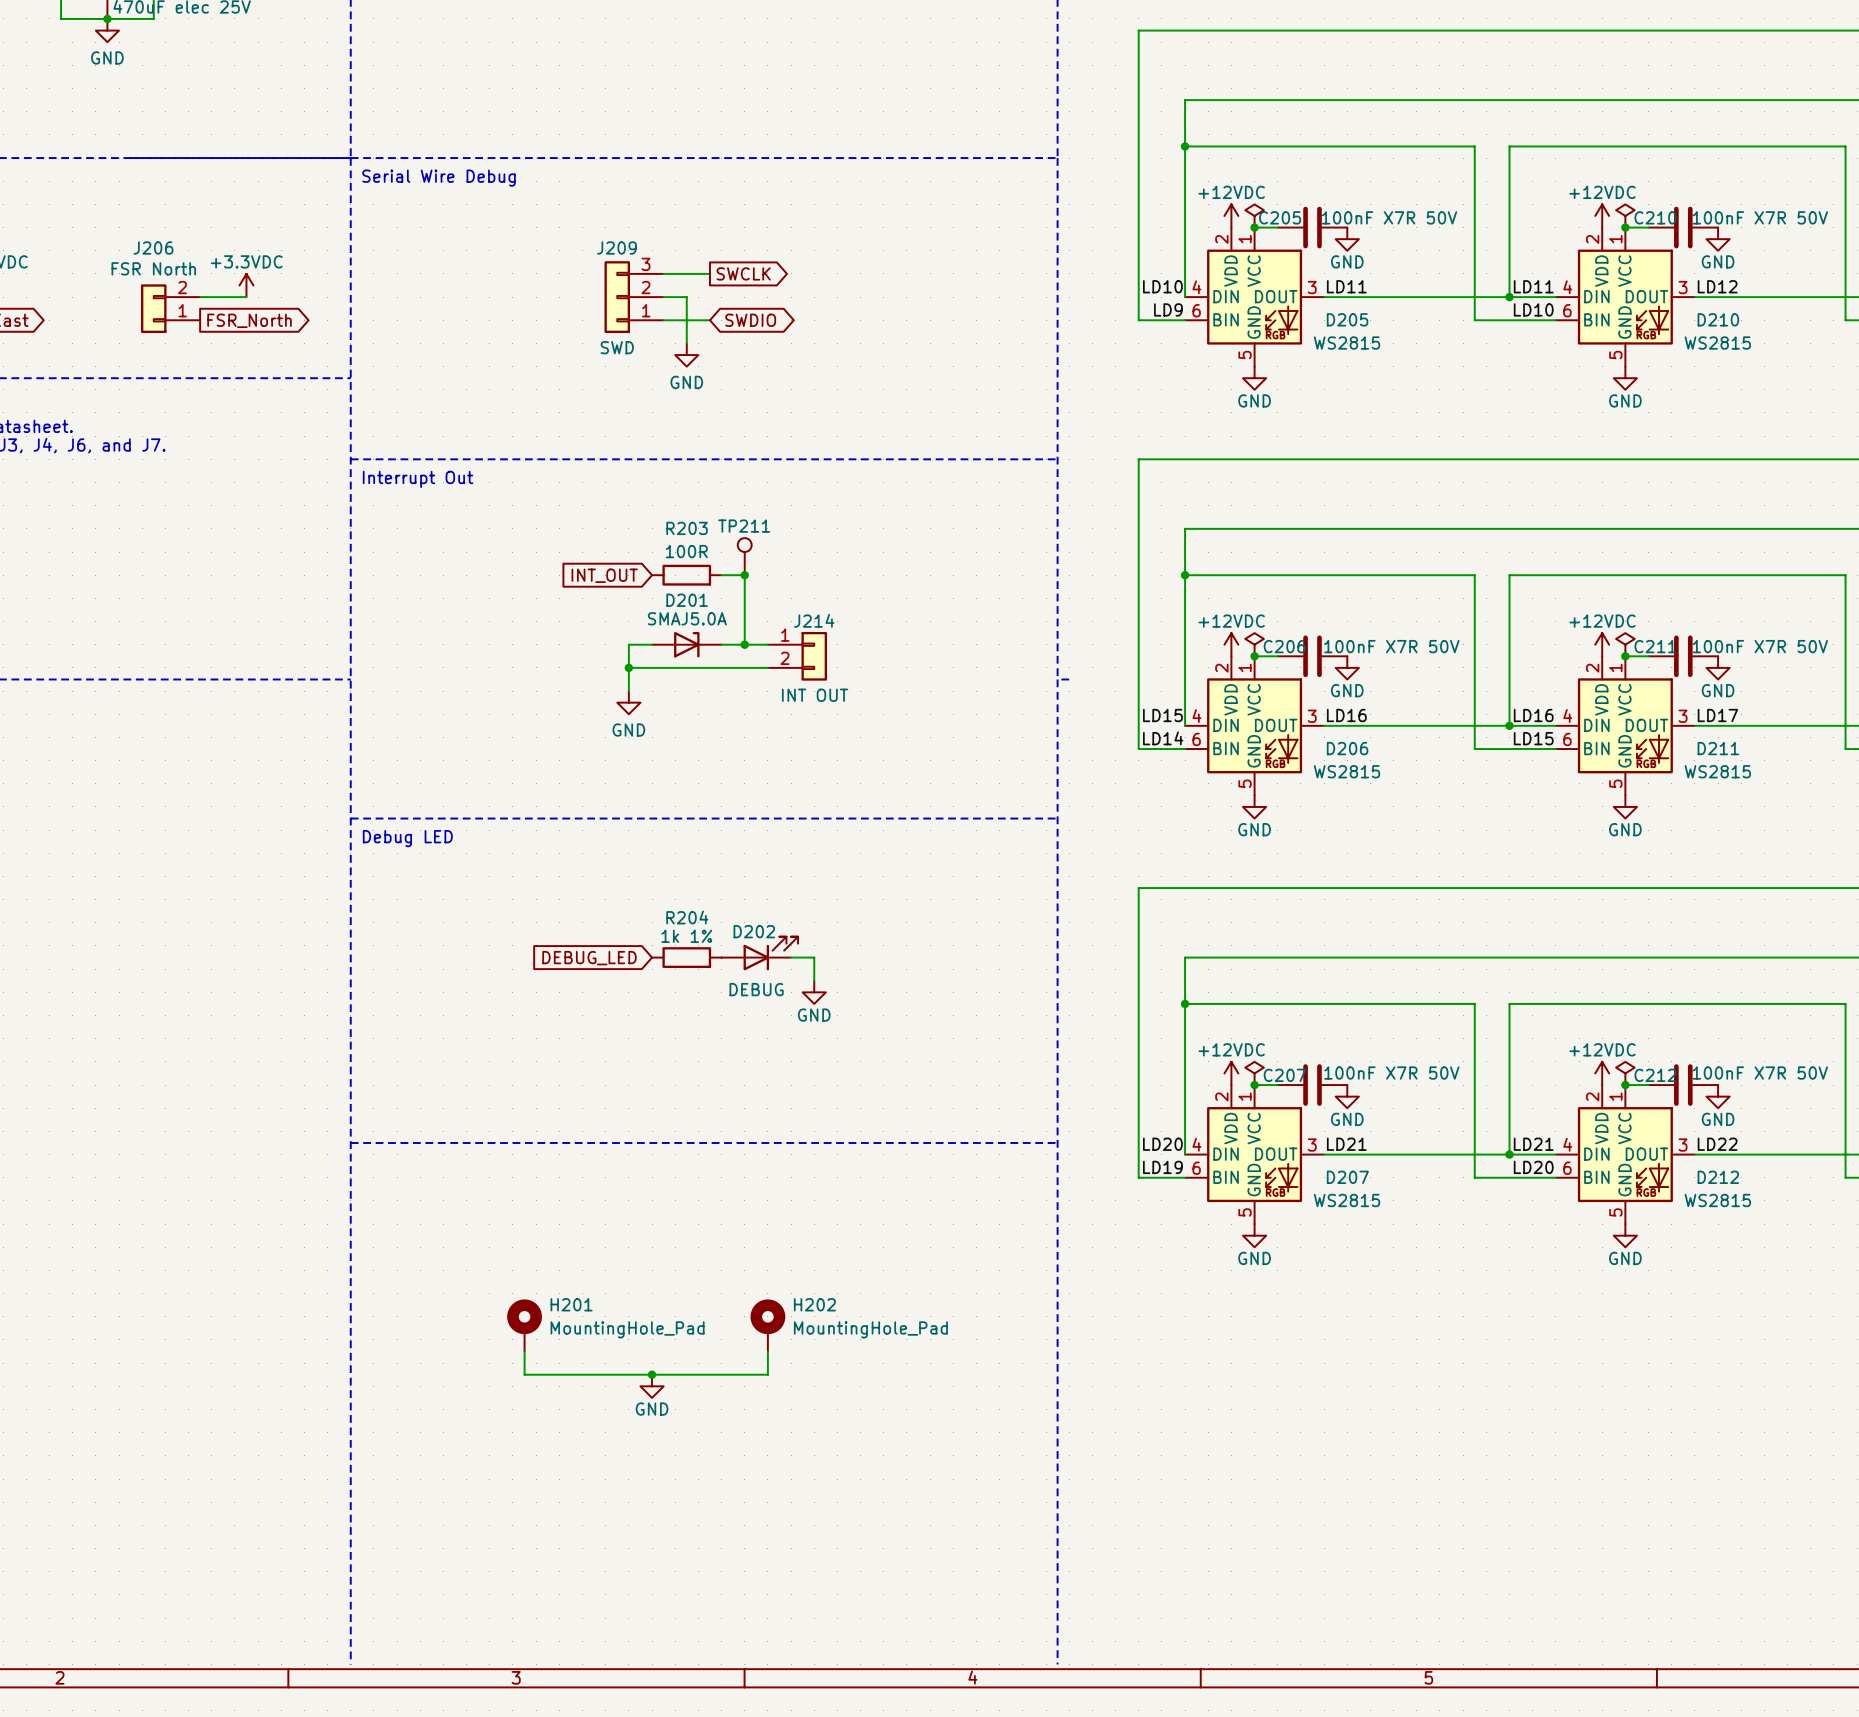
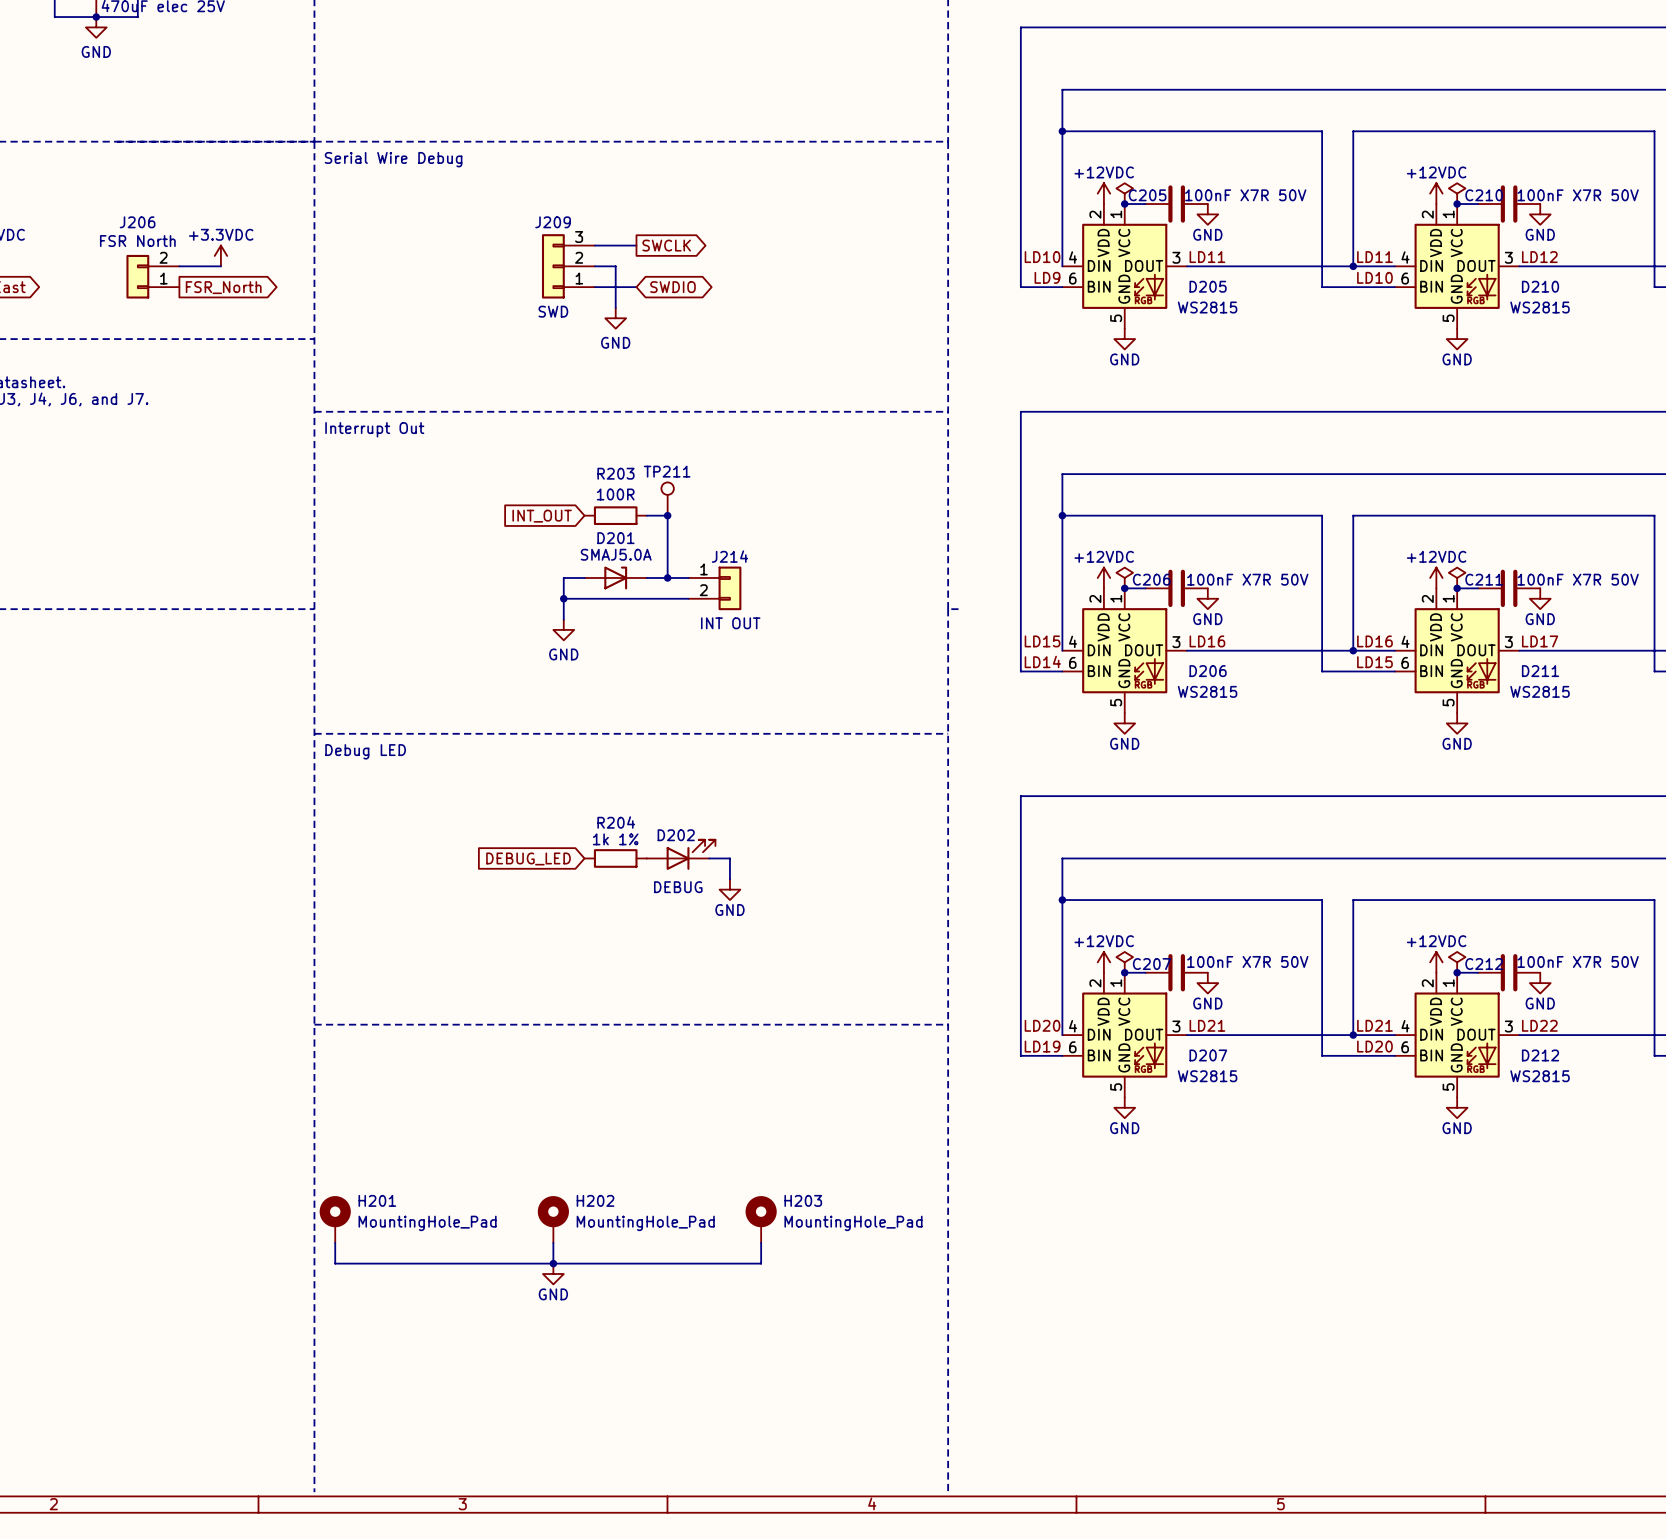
H201 position: (524, 1325) -> (335, 1219)
H202 position: (767, 1325) -> (553, 1219)
wire: (524, 1351) (524, 1374) (767, 1374) (767, 1351) -> none
H203: none -> MountingHole_Pad (761, 1219)
junction position: (652, 1374) -> (553, 1263)
wire: none -> (335, 1242) (335, 1263) (761, 1263) (761, 1242)
wire: none -> (553, 1242) (553, 1263)
power symbol position: GND (652, 1386) -> GND (553, 1274)

